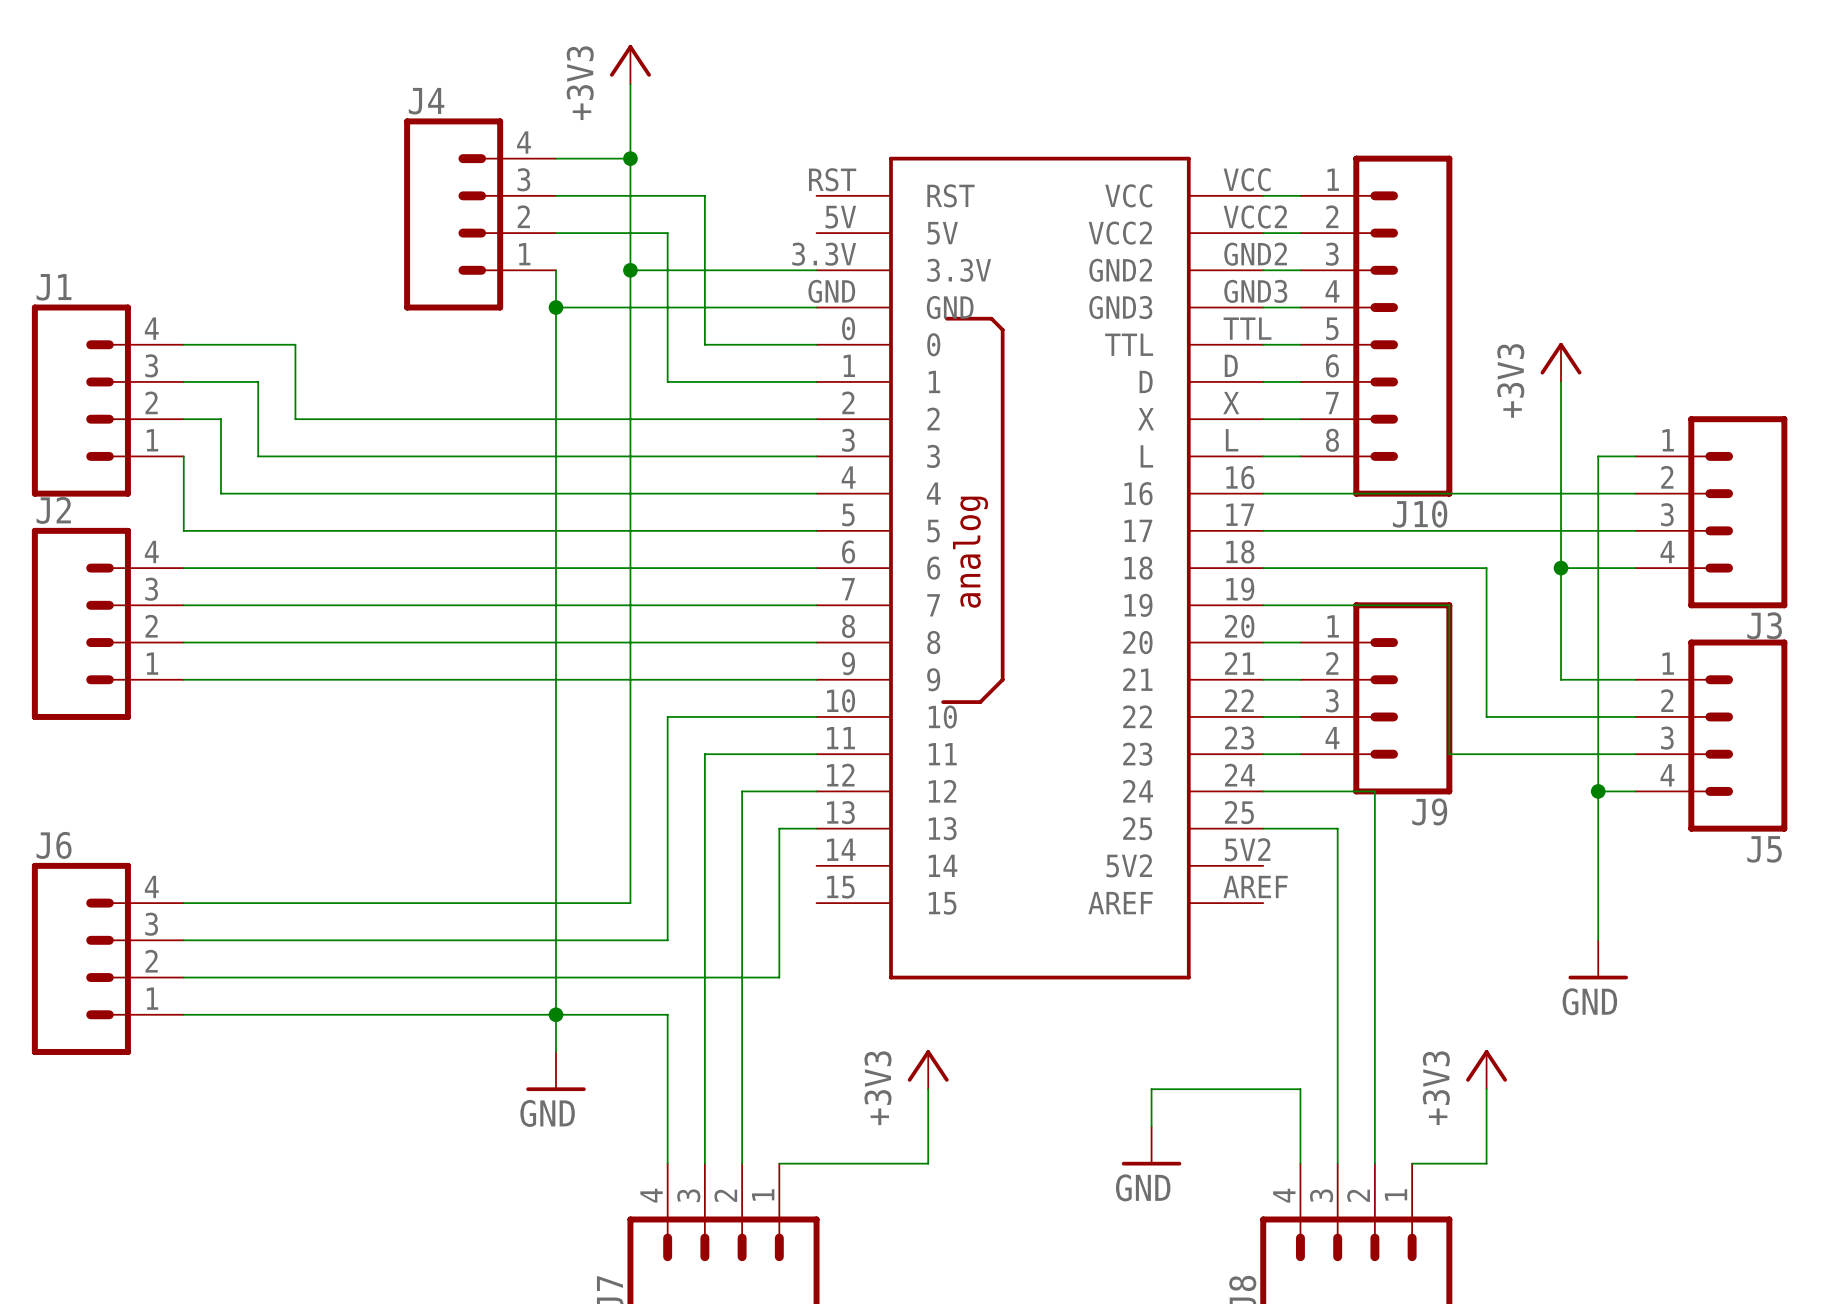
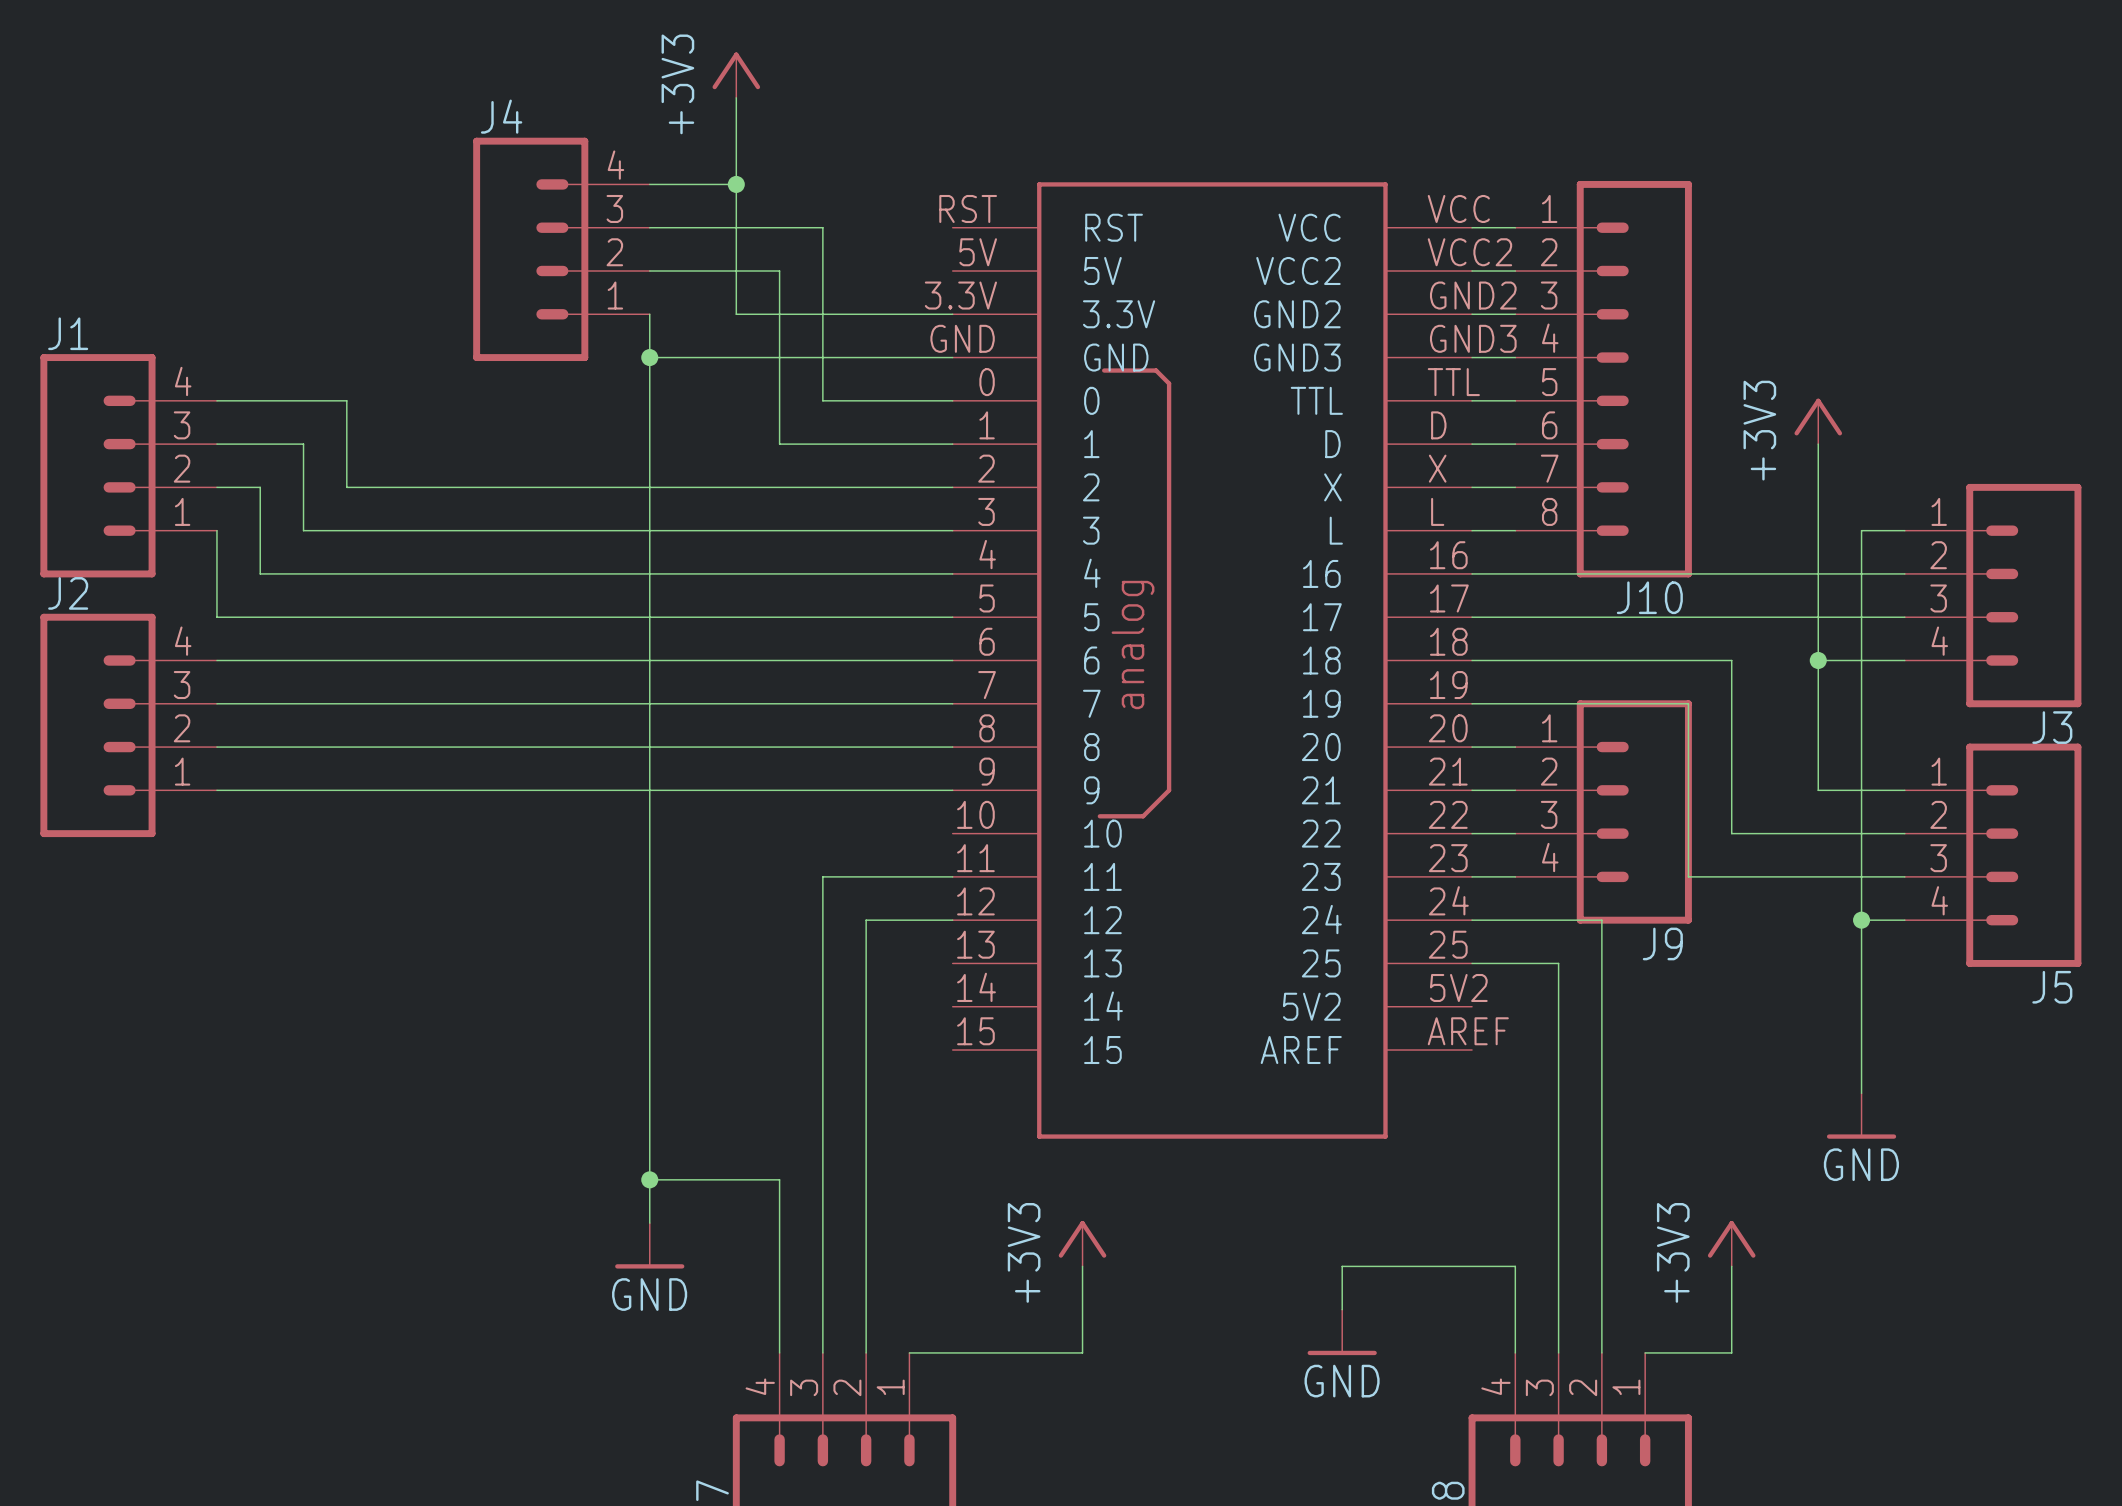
wire: (630, 270) (630, 903) (183, 903) -> none
junction: (630, 270) -> none
wire: (816, 716) (667, 716) (667, 940) (183, 940) -> none
wire: (816, 828) (779, 828) (779, 977) (183, 977) -> none
J6: (107, 958) -> none
wire: (183, 1014) (555, 1014) -> none

